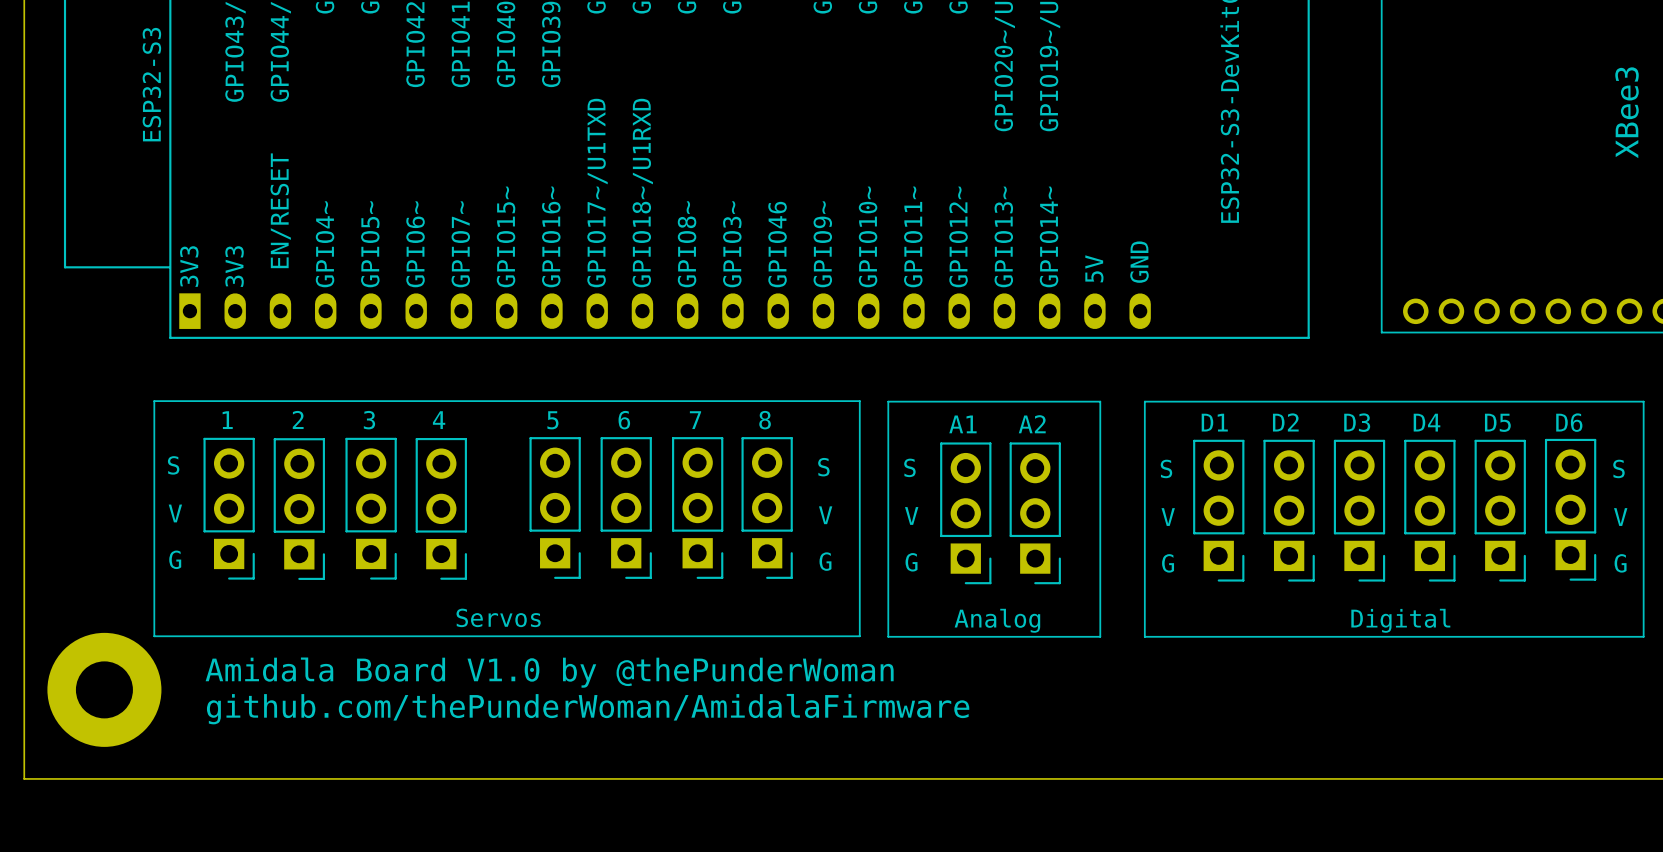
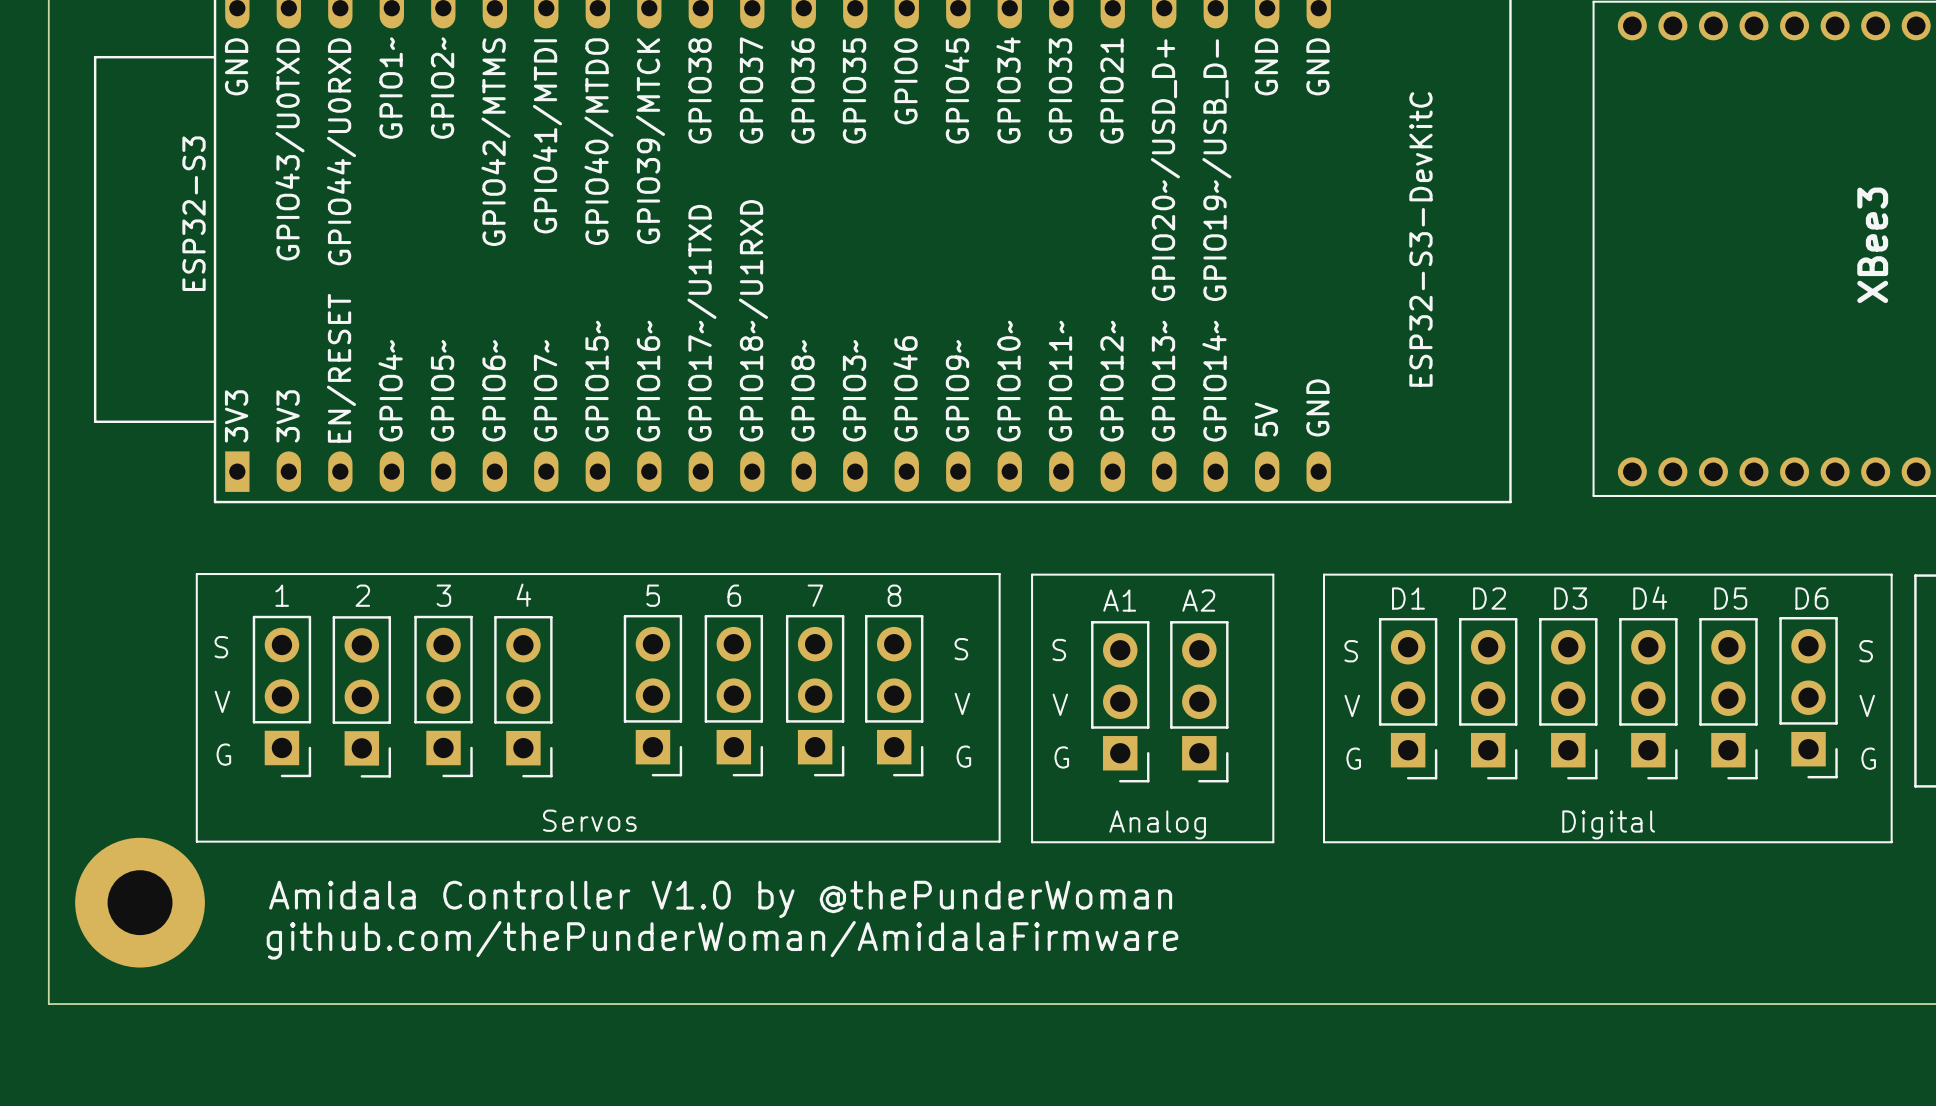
text: Amidala Board V1.0 by @thePunderWoman (549, 672) -> Amidala Controller V1.0 by @thePunderWoman (720, 899)
text position: github.com/thePunderWoman/AmidalaFirmware (588, 709) -> github.com/thePunderWoman/AmidalaFirmware (722, 940)

